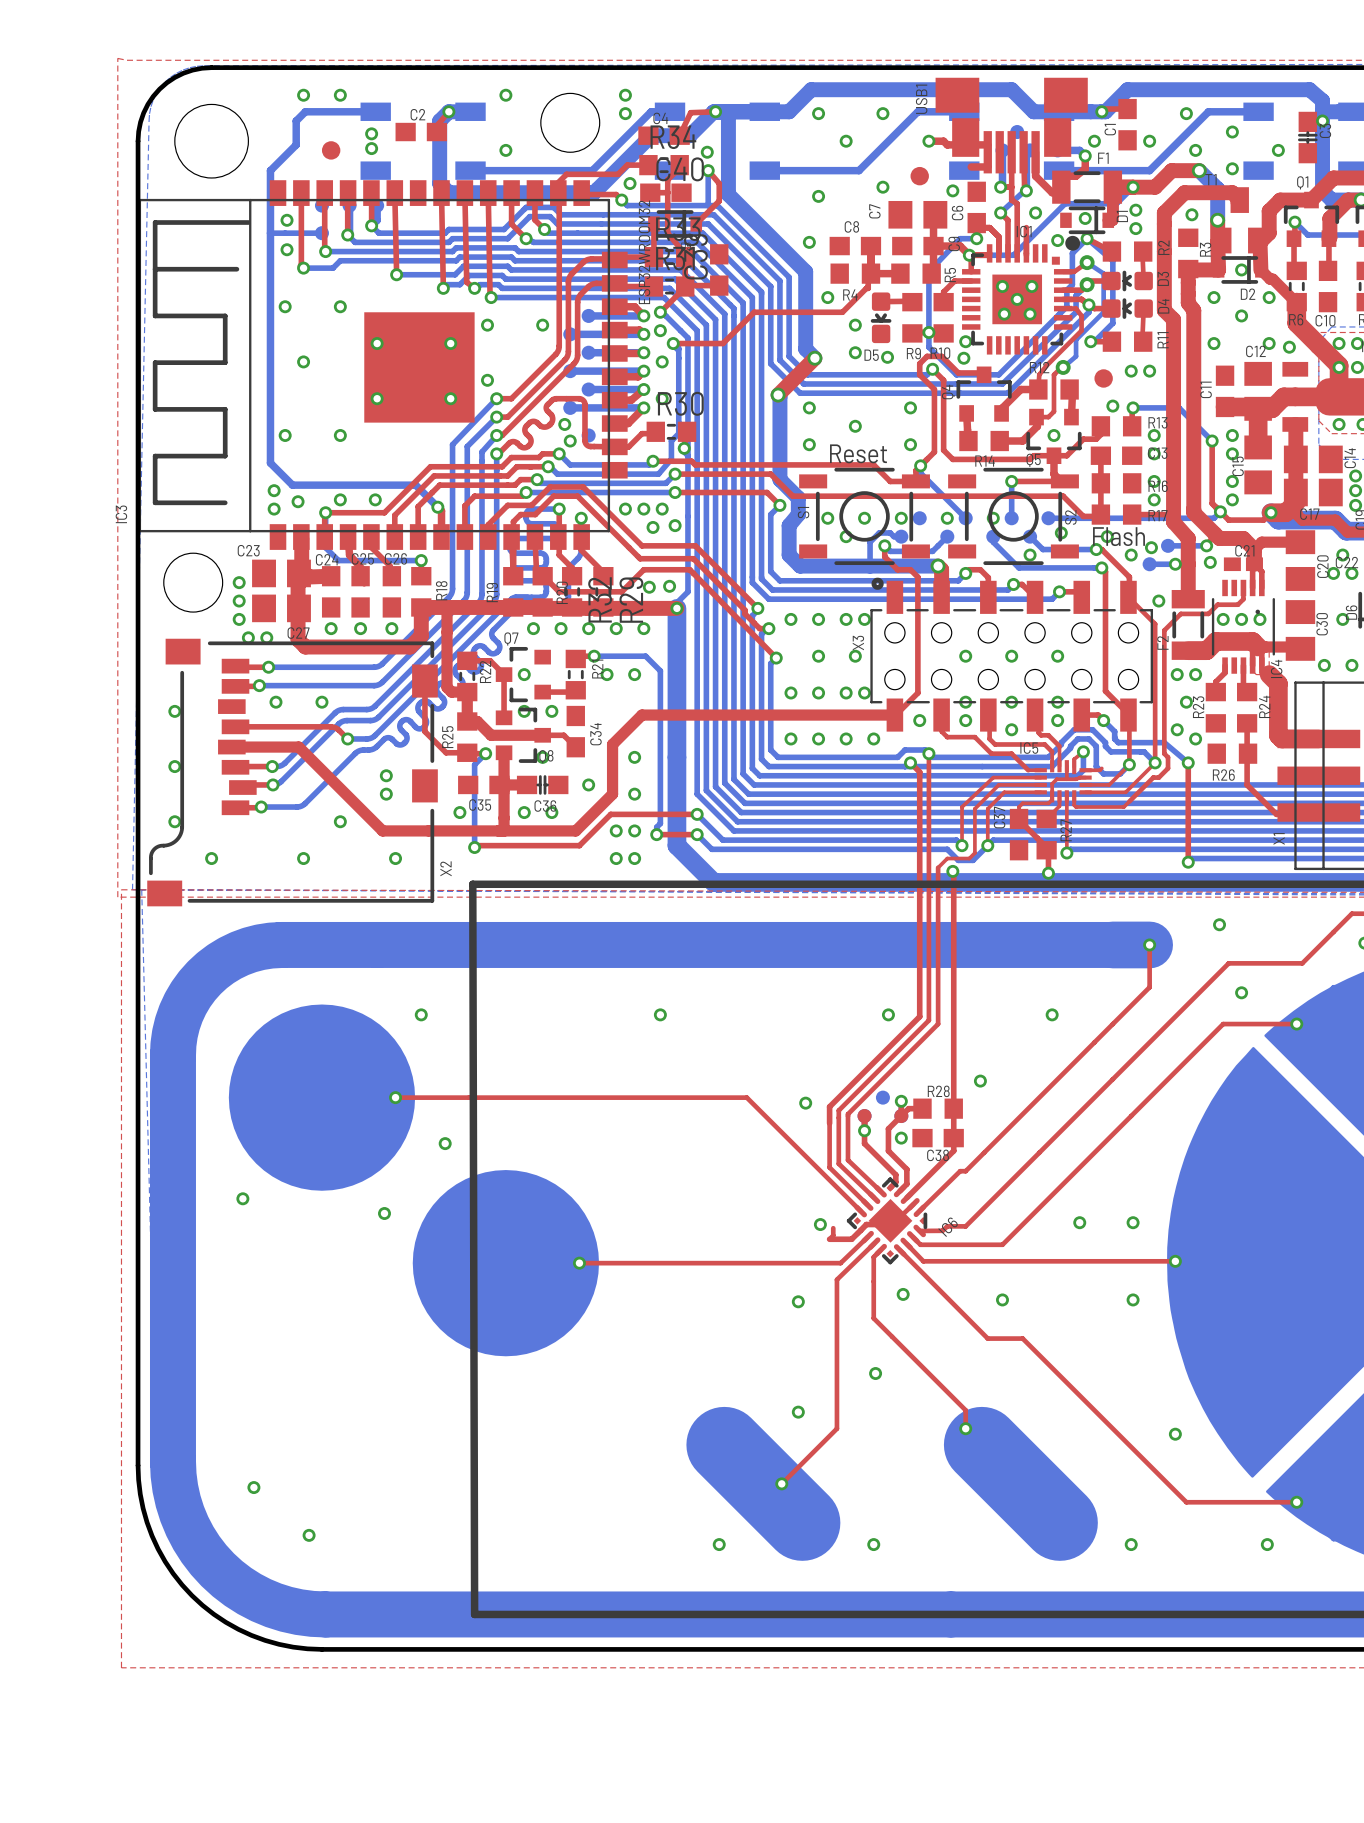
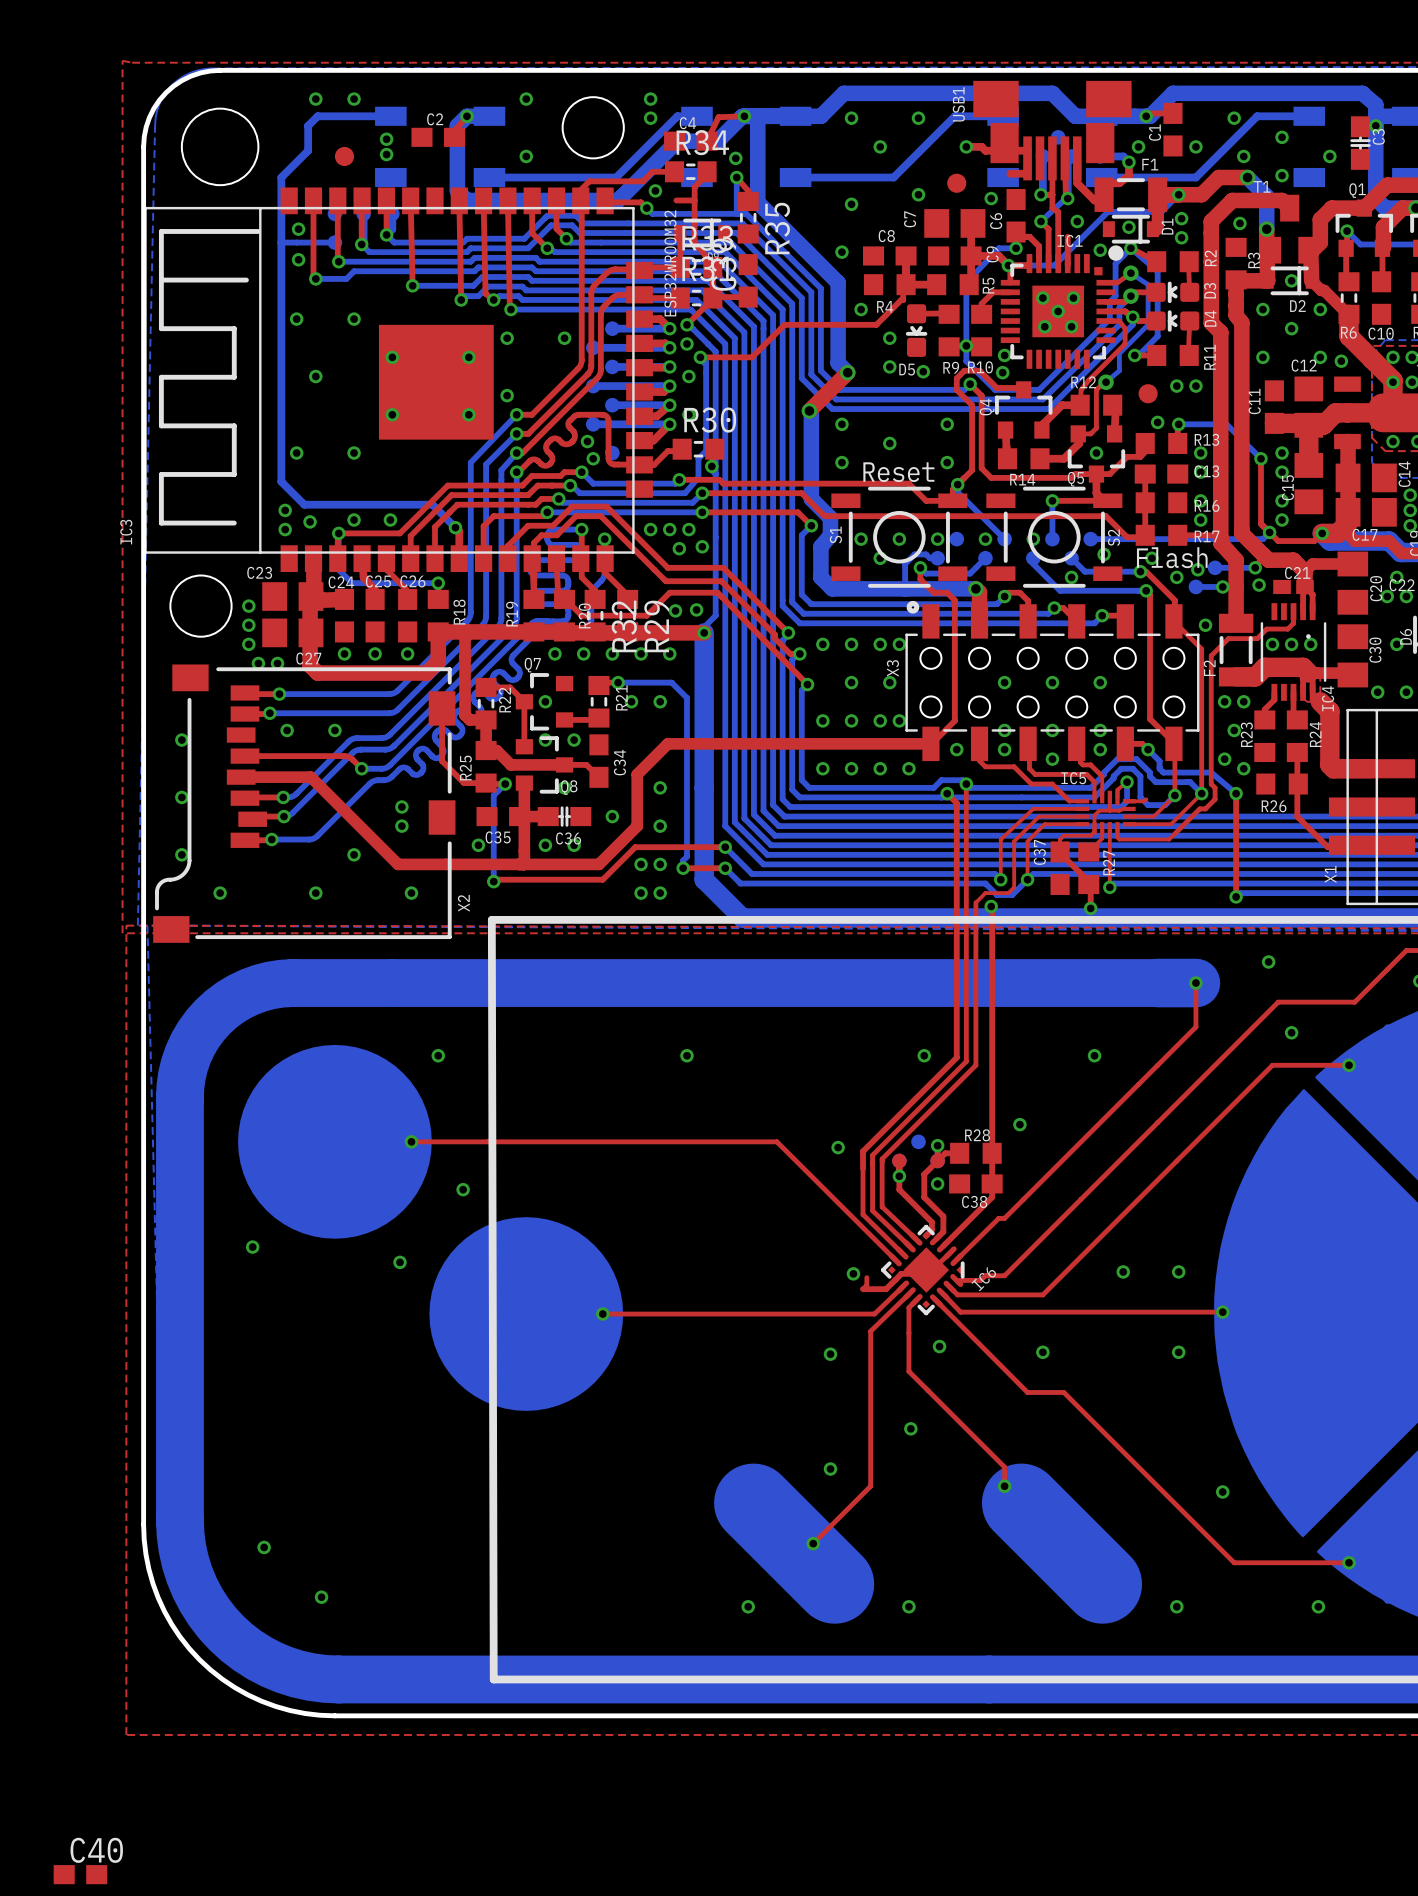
C40 position: (665, 192) -> (80, 1874)
top track: (719, 193) (719, 200) (696, 223) -> none
R35: none -> (748, 217)

